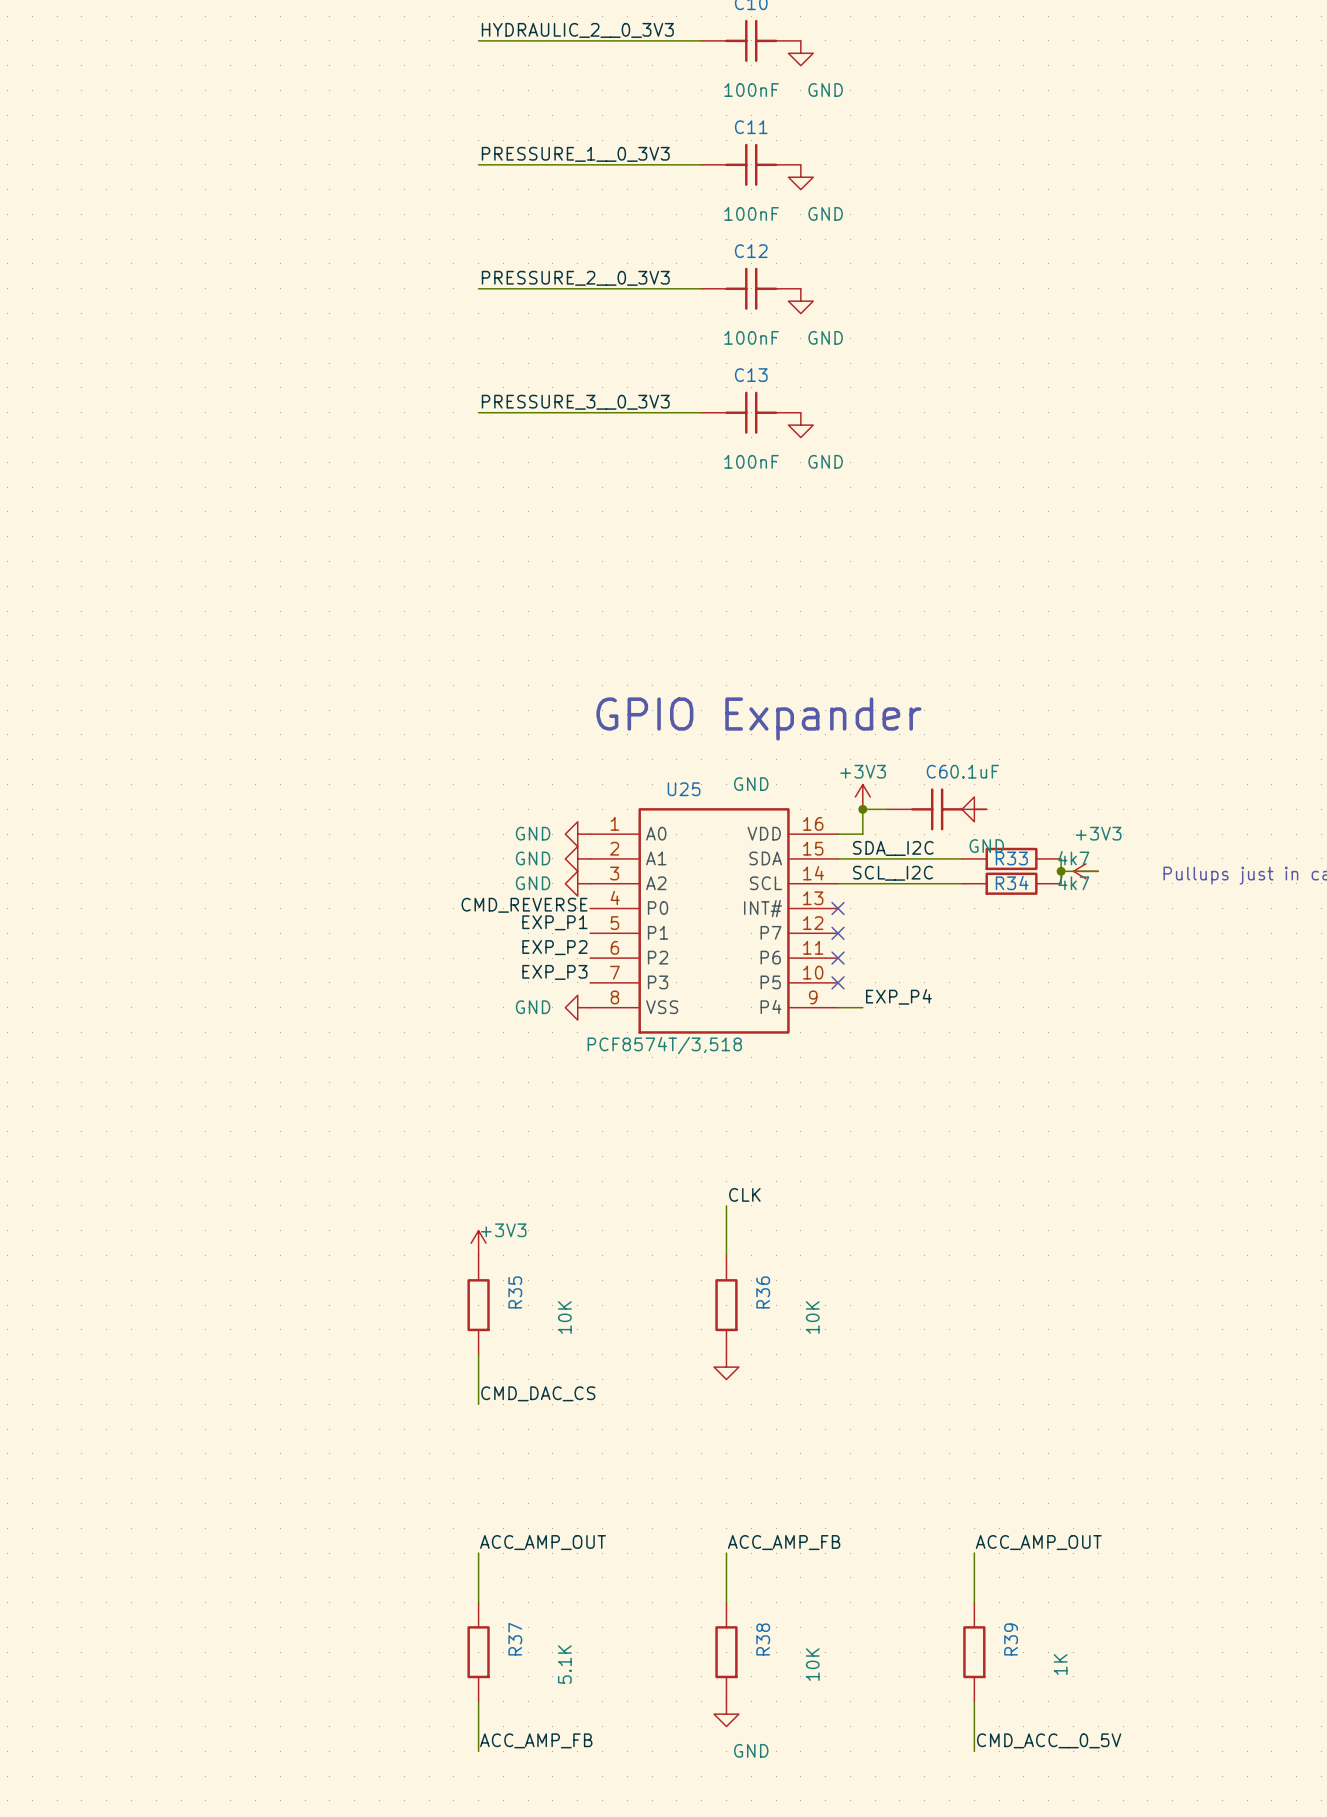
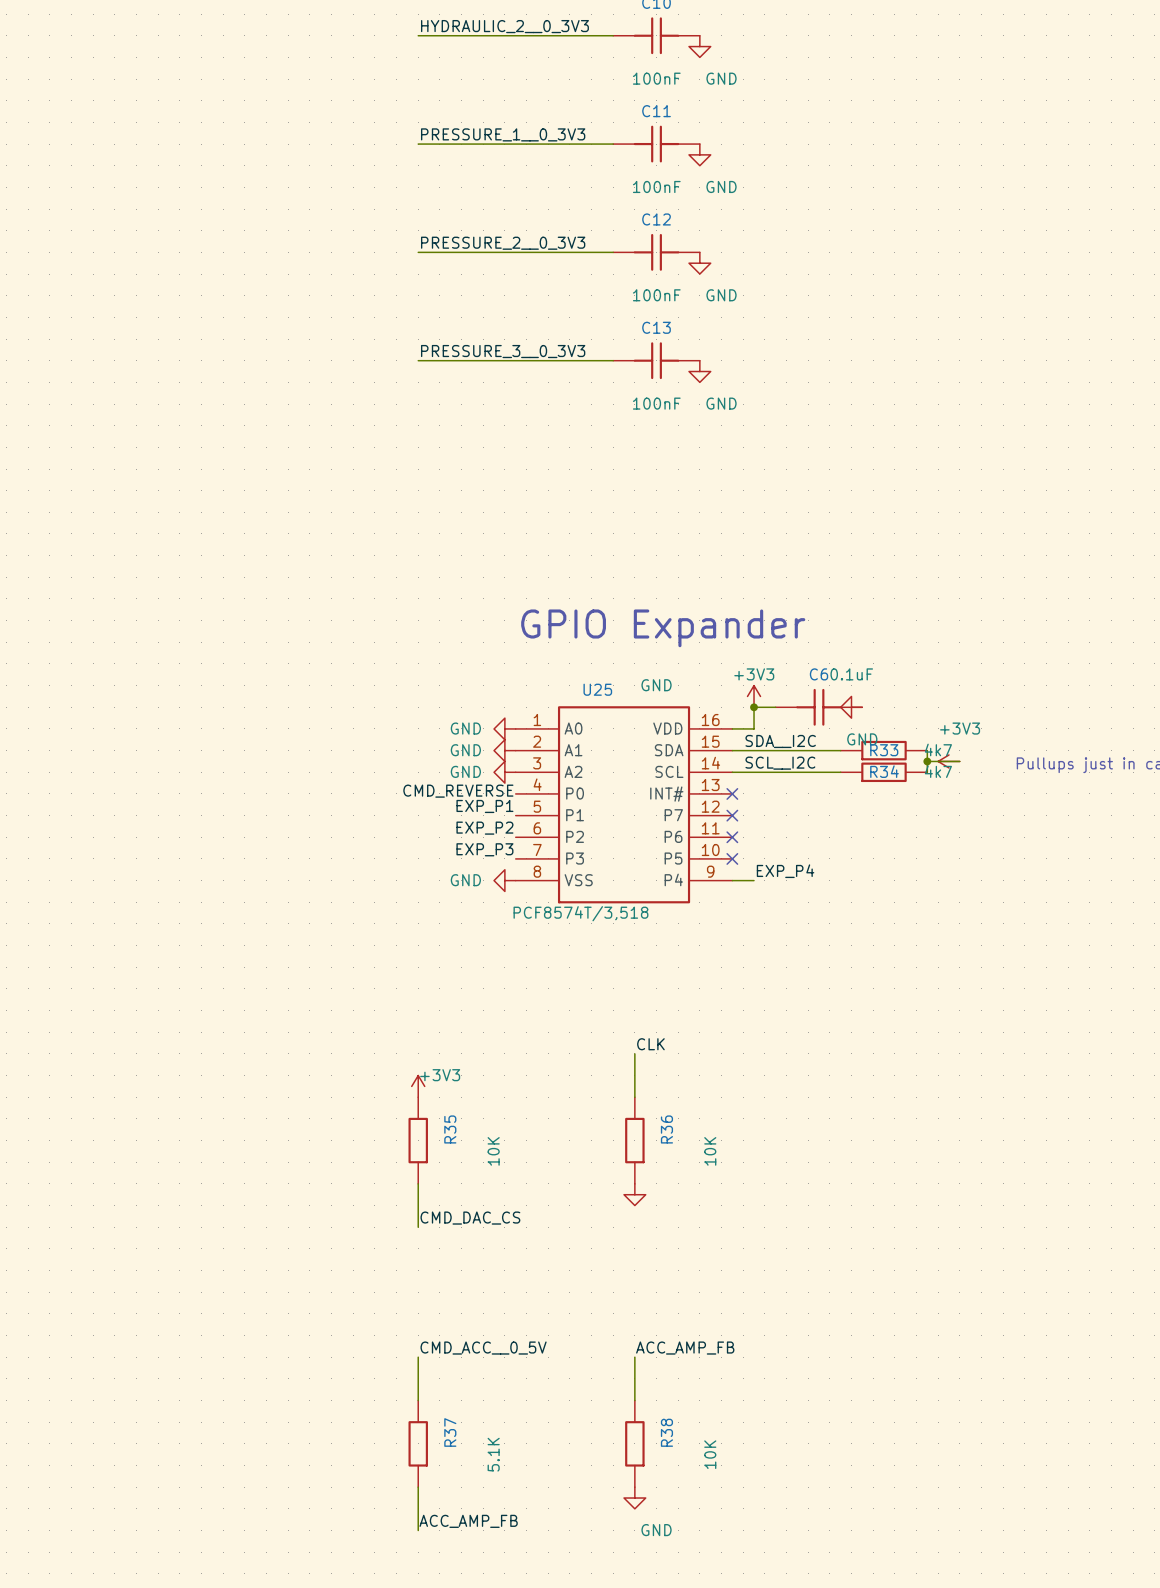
label: ACC_AMP_OUT (543, 1542) -> CMD_ACC__0_5V (483, 1348)
label: ACC_AMP_OUT (1038, 1542) -> none
wire: (974, 1553) (974, 1602) -> none
R39: 1K (974, 1652) -> none
wire: (974, 1701) (974, 1751) -> none
label: CMD_ACC__0_5V (1049, 1740) -> none

